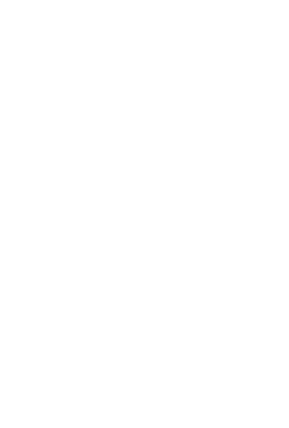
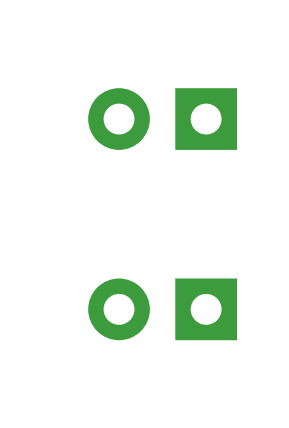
part: none -> (162, 119)
part: none -> (162, 309)

